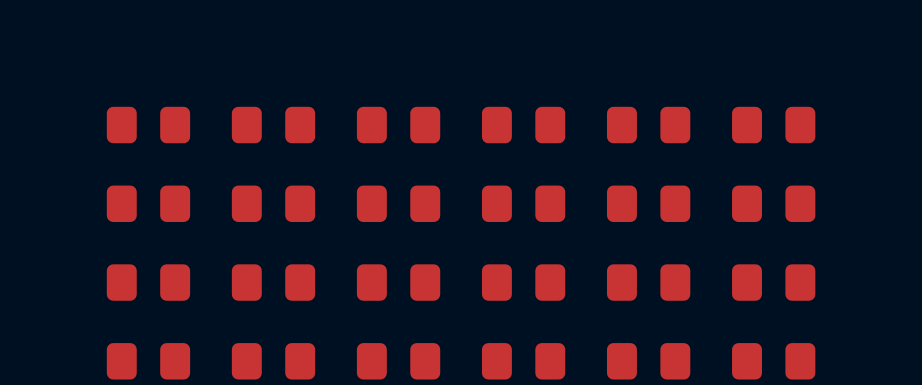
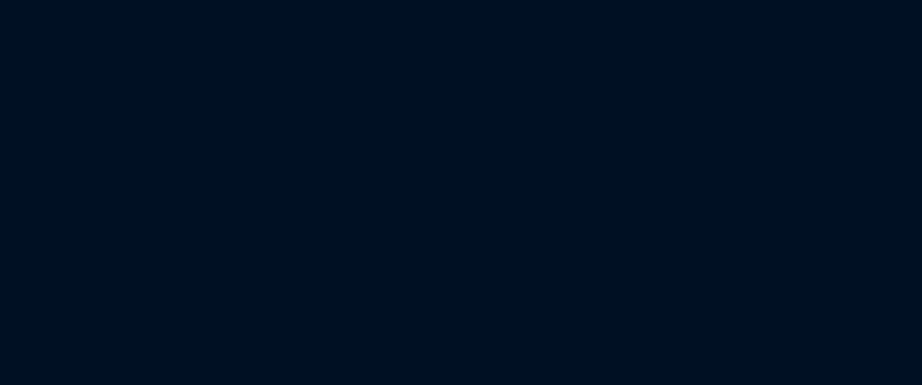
part: (148, 125) -> none
part: (273, 125) -> none
part: (398, 125) -> none
part: (523, 125) -> none
part: (648, 125) -> none
part: (773, 125) -> none
part: (148, 203) -> none
part: (273, 203) -> none
part: (398, 203) -> none
part: (523, 203) -> none
part: (648, 203) -> none
part: (773, 203) -> none
part: (148, 282) -> none
part: (273, 282) -> none
part: (398, 282) -> none
part: (523, 282) -> none
part: (648, 282) -> none
part: (773, 282) -> none
part: (148, 361) -> none
part: (273, 361) -> none
part: (398, 361) -> none
part: (523, 361) -> none
part: (648, 361) -> none
part: (773, 361) -> none

